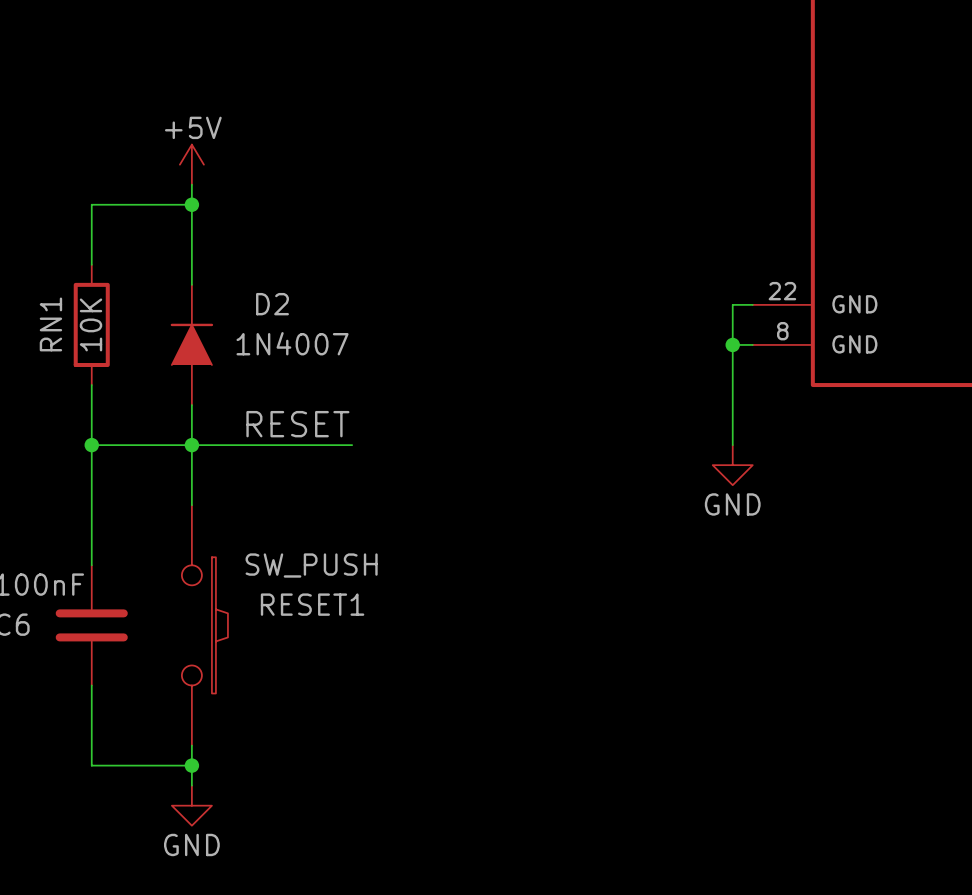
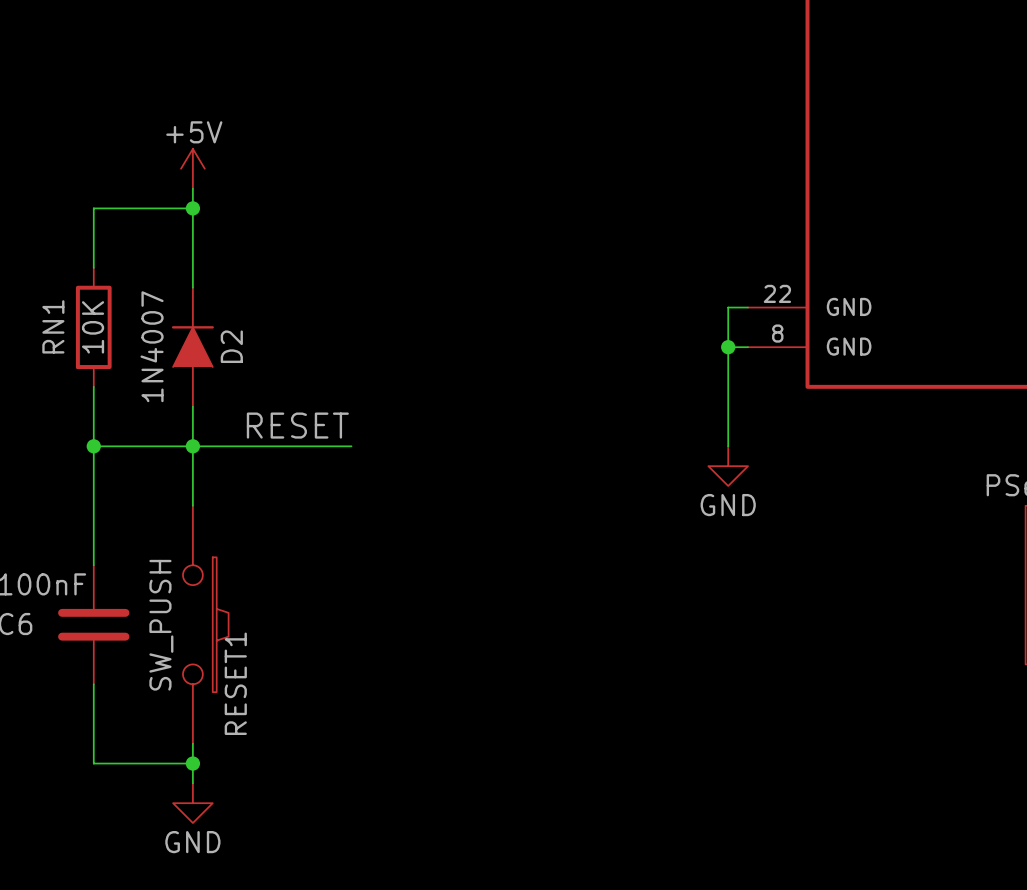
D2 name rotation: 0° (272, 304) -> 90° counterclockwise (231, 346)
D2 name position: D2 (272, 304) -> D2 (231, 346)
D2 value rotation: 0° (292, 343) -> 90° counterclockwise (152, 346)
D2 value position: 1N4007 (292, 343) -> 1N4007 (152, 346)
RESET1 value rotation: 0° (311, 565) -> 90° counterclockwise (161, 625)
RESET1 value position: SW_PUSH (311, 565) -> SW_PUSH (161, 625)
RESET1 name rotation: 0° (312, 604) -> 90° counterclockwise (235, 683)

